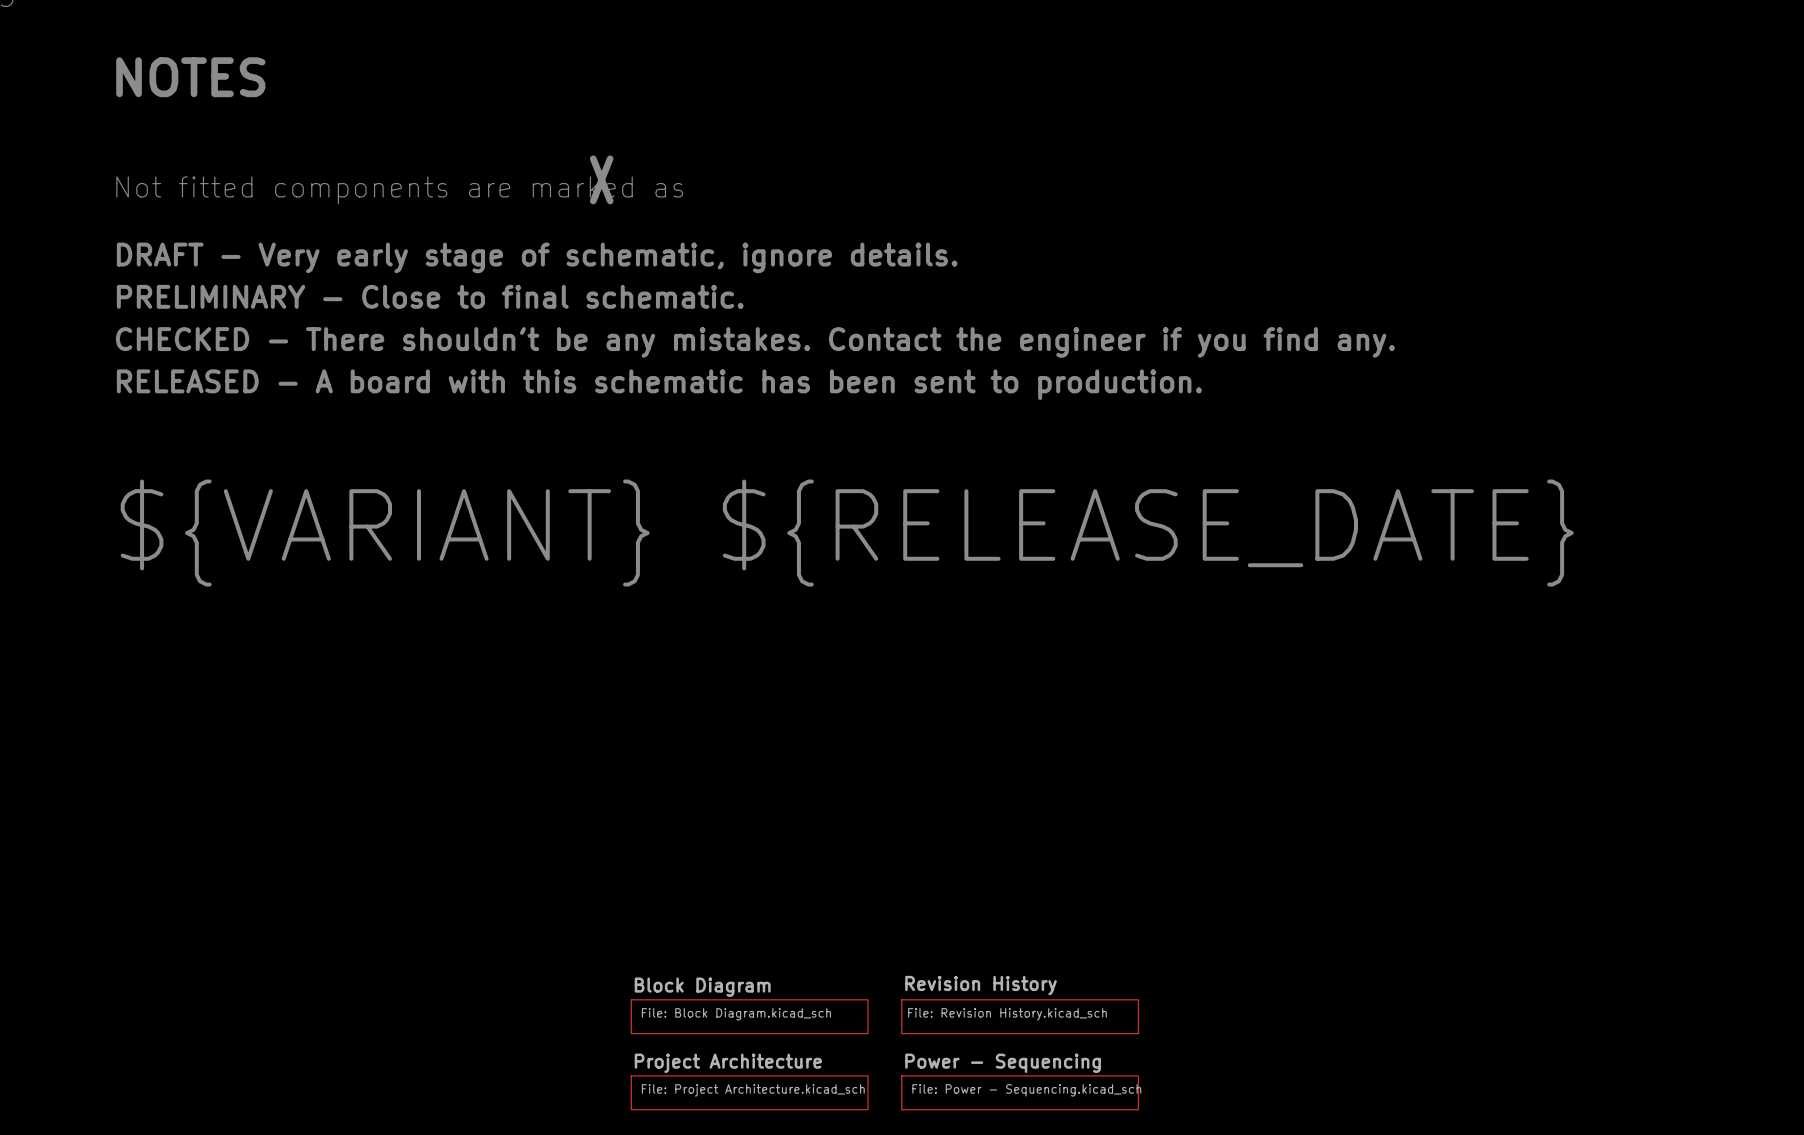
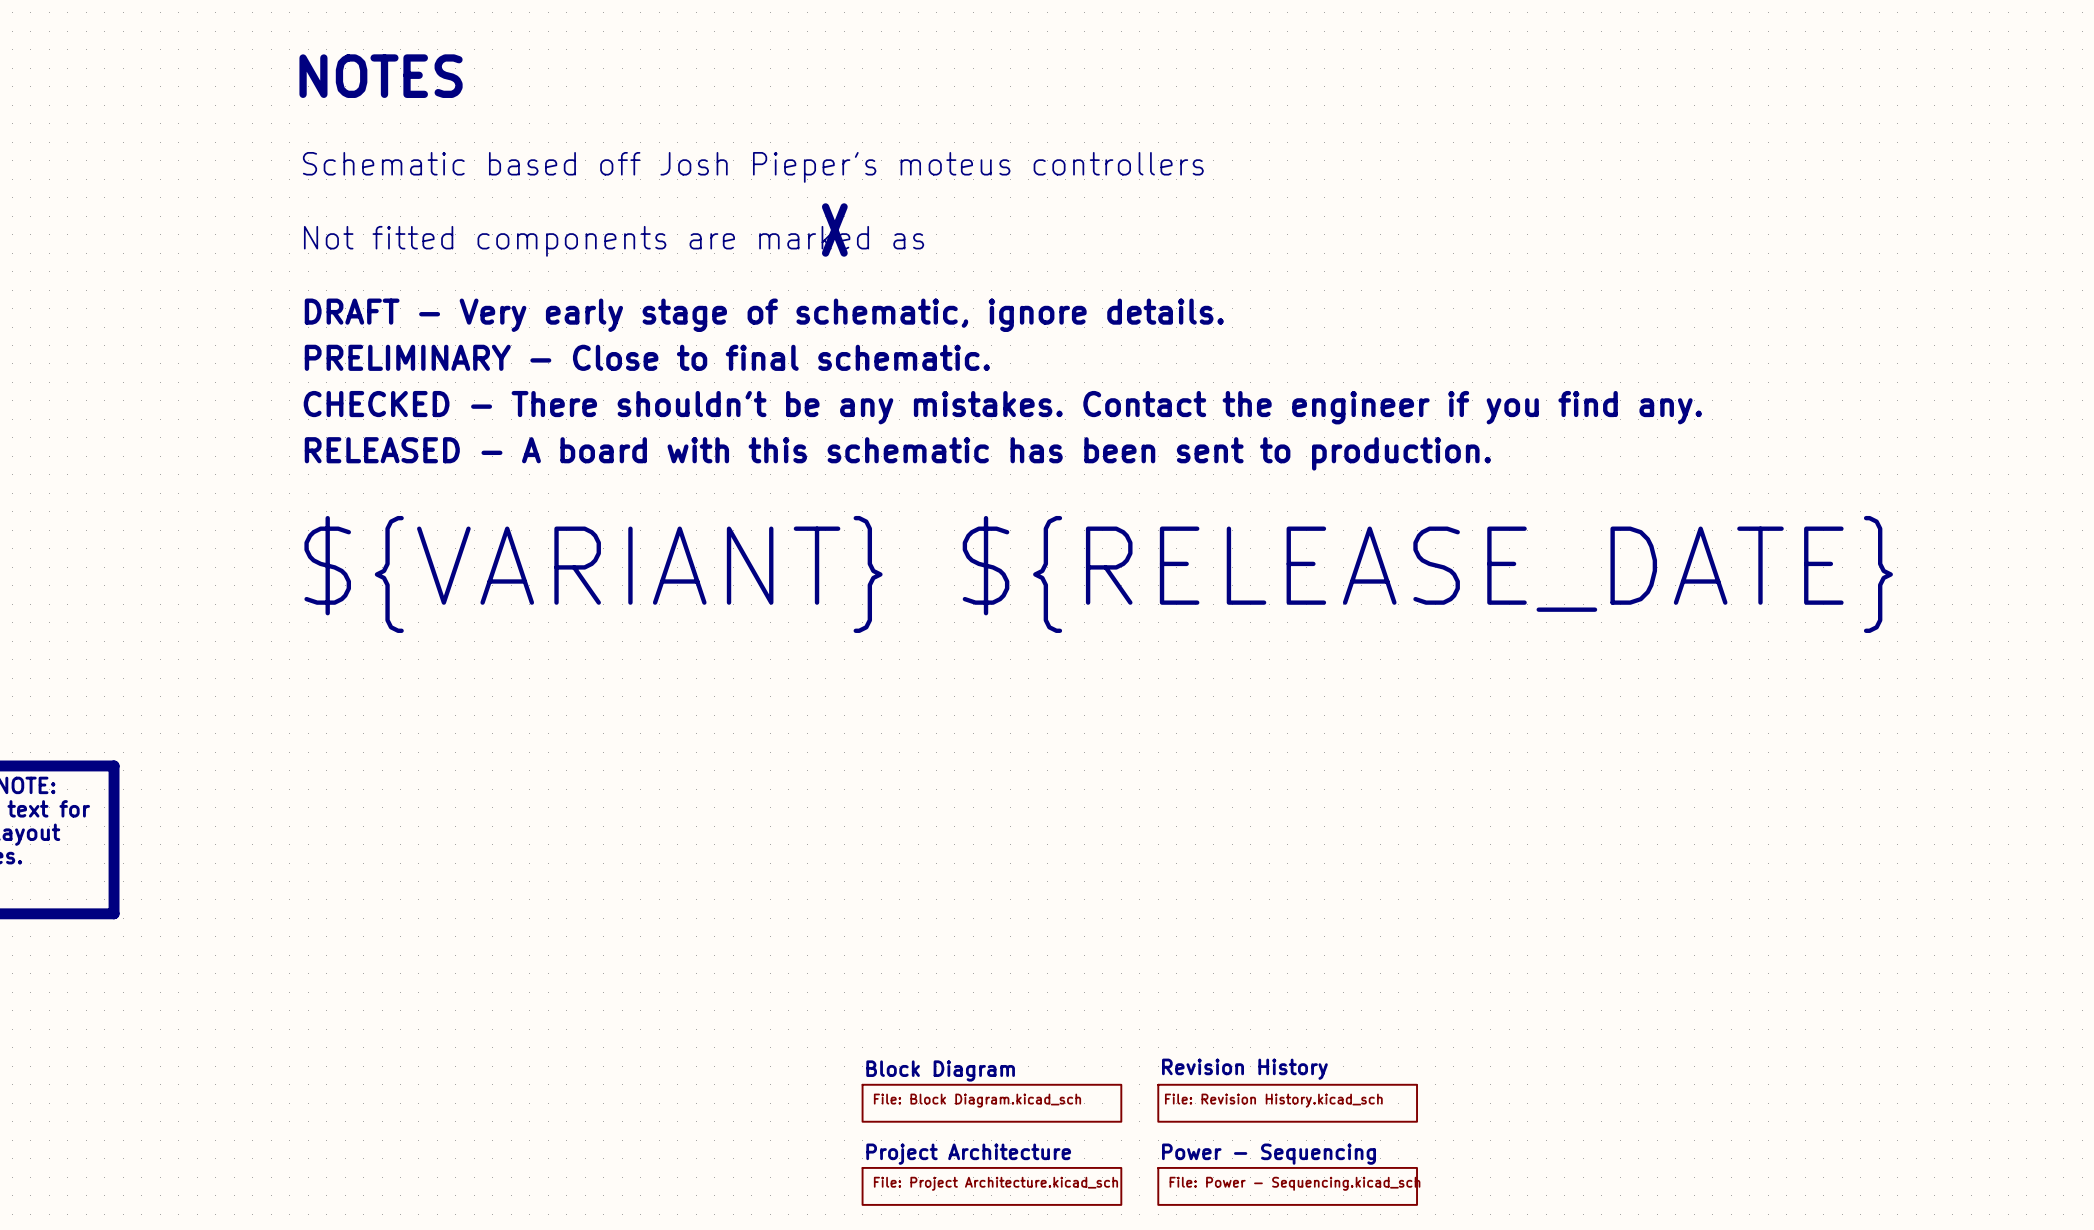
line: (593, 158) (610, 201) -> (825, 206) (844, 253)
line: (610, 158) (593, 201) -> (844, 206) (825, 253)
text: none -> Schematic based off Josh Pieper's moteus controllers (753, 167)
text position: Not fitted components are marked as (399, 190) -> Not fitted components are marked as (614, 241)
text position: DRAFT - Very early stage of schematic, ignore details. (537, 257) -> DRAFT - Very early stage of schematic, ignore details. (764, 315)
text position: PRELIMINARY - Close to final schematic. (430, 296) -> PRELIMINARY - Close to final schematic. (647, 357)
text position: CHECKED - There shouldn't be any mistakes. Contact the engineer if you find any. (755, 342) -> CHECKED - There shouldn't be any mistakes. Contact the engineer if you find any. (1002, 407)
text position: RELEASED - A board with this schematic has been sent to production. (659, 384) -> RELEASED - A board with this schematic has been sent to production. (897, 453)

